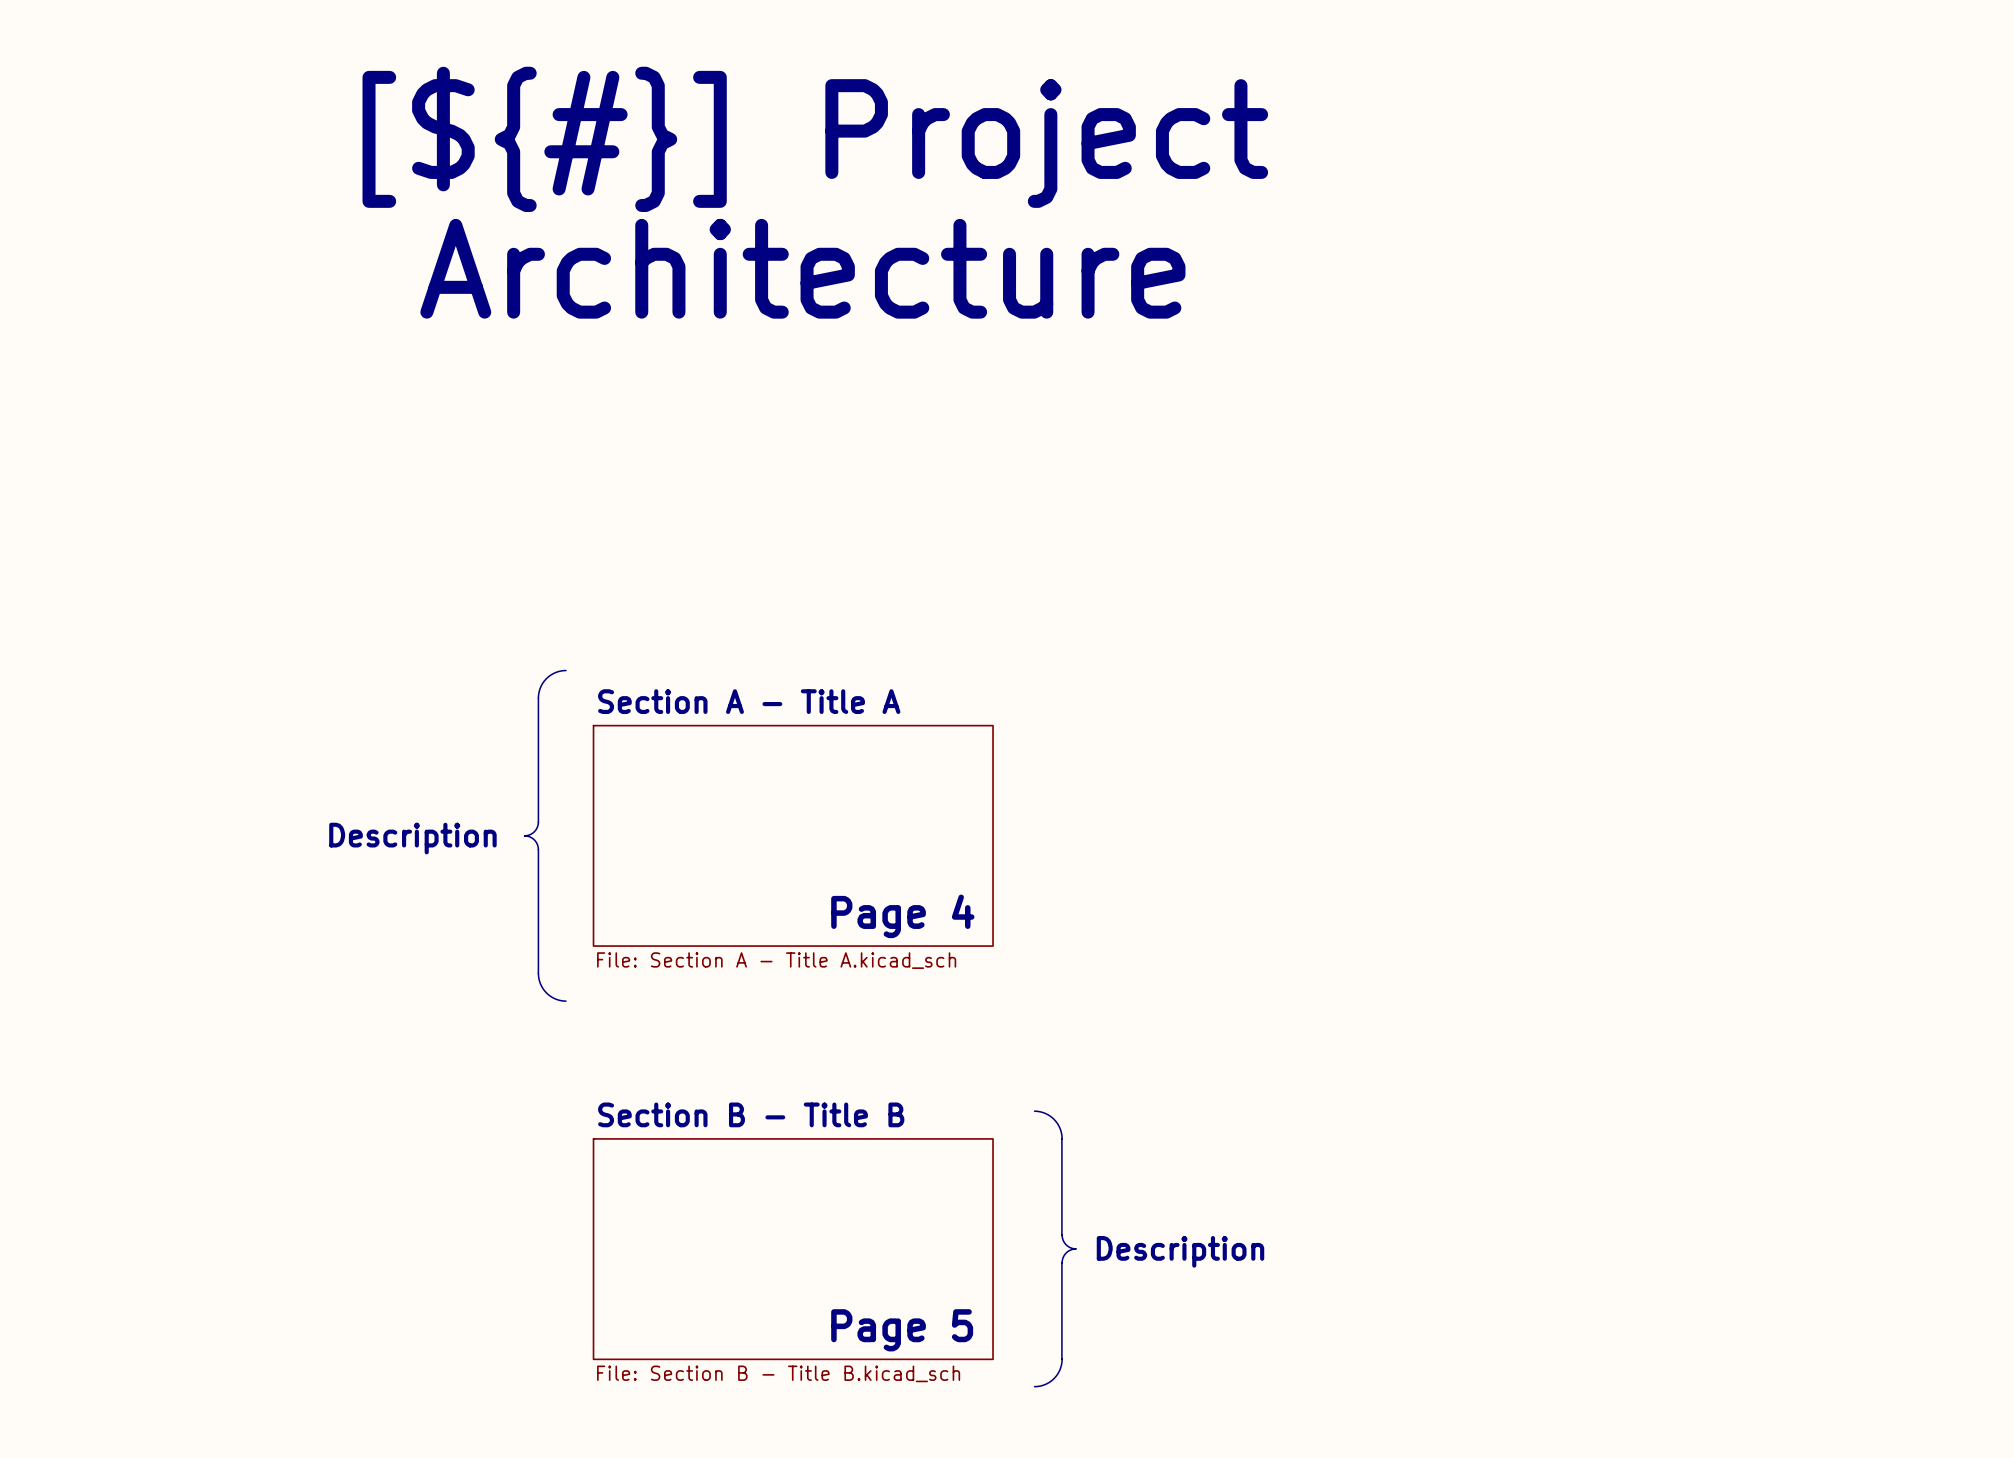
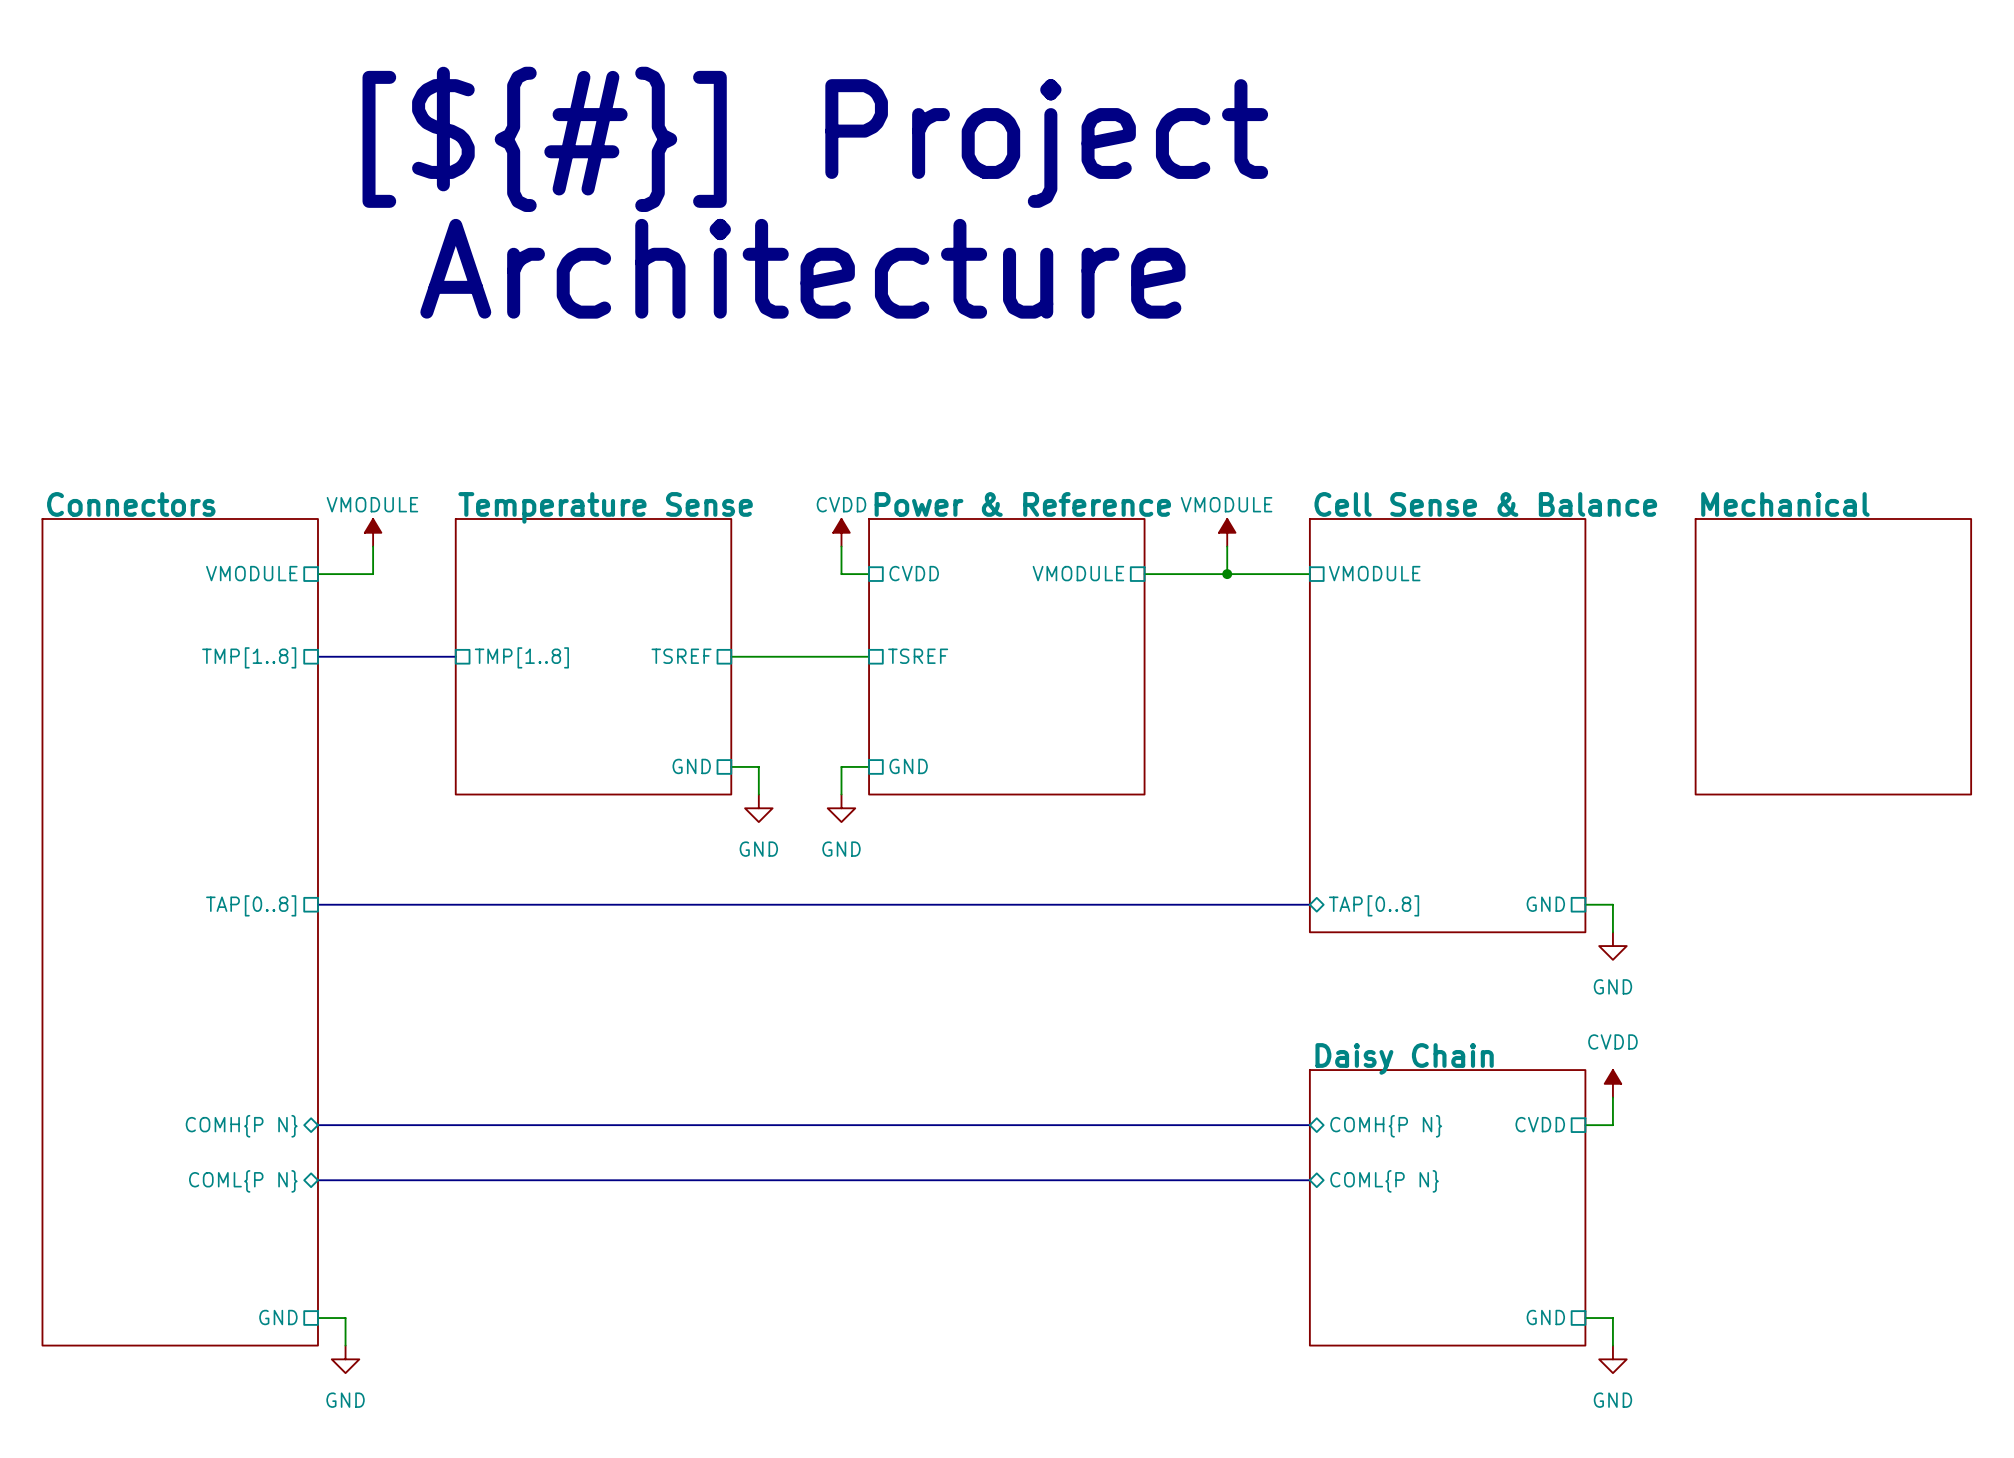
power symbol: none -> VMODULE (373, 532)
power symbol: none -> CVDD (841, 532)
power symbol: none -> VMODULE (1227, 532)
wire: none -> (373, 546) (373, 574) (317, 574)
wire: none -> (841, 546) (841, 574) (869, 574)
wire: none -> (1227, 546) (1227, 574)
sheet pin: none -> VMODULE (251, 573)
sheet pin: none -> CVDD (914, 573)
sheet pin: none -> VMODULE (1078, 573)
sheet pin: none -> VMODULE (1374, 573)
wire: none -> (1144, 574) (1309, 574)
junction: none -> (1227, 574)
bus: none -> (317, 656) (455, 656)
sheet Temperature Sense: none -> (593, 656)
sheet pin: none -> TSREF (681, 656)
wire: none -> (731, 656) (869, 656)
sheet pin: none -> TSREF (918, 656)
sheet Power & Reference: none -> (1006, 656)
sheet Mechanical: none -> (1833, 656)
sheet pin: none -> TMP[1..8] (249, 657)
sheet pin: none -> TMP[1..8] (521, 657)
line: (565, 670) (556, 672) (548, 676) (542, 683) (539, 691) (538, 823) (532, 832) (524, 835) (532, 838) (538, 847) (539, 980) (549, 995) (565, 1001) -> none
sheet Cell Sense & Balance: none -> (1447, 725)
sheet pin: none -> GND (691, 766)
wire: none -> (731, 766) (758, 766) (758, 794)
wire: none -> (869, 766) (841, 766) (841, 794)
sheet pin: none -> GND (908, 766)
power symbol: none -> GND (758, 808)
power symbol: none -> GND (841, 808)
sheet Section A - Title A: File: Section A - Title A.kicad_sch (793, 835) -> none
text: Description (412, 838) -> none
bus: none -> (317, 904) (1309, 904)
sheet pin: none -> GND (1545, 904)
wire: none -> (1585, 904) (1612, 904) (1612, 932)
sheet pin: none -> TAP[0..8] (251, 905)
sheet pin: none -> TAP[0..8] (1374, 905)
text: Page 4 (902, 916) -> none
sheet Connectors: none -> (180, 932)
power symbol: none -> GND (1612, 946)
power symbol: none -> CVDD (1612, 1083)
wire: none -> (1612, 1097) (1612, 1125) (1585, 1125)
line: (1034, 1111) (1045, 1113) (1053, 1119) (1059, 1128) (1062, 1138) -> none
sheet pin: none -> CVDD (1540, 1124)
bus: none -> (317, 1125) (1309, 1125)
sheet pin: none -> COMH{P N} (241, 1126)
sheet pin: none -> COMH{P N} (1386, 1126)
line: (1061, 1138) (1061, 1235) -> none
bus: none -> (317, 1180) (1309, 1180)
sheet pin: none -> COML{P N} (243, 1181)
sheet pin: none -> COML{P N} (1384, 1181)
sheet Daisy Chain: none -> (1447, 1207)
line: (1062, 1235) (1066, 1244) (1075, 1248) (1066, 1252) (1062, 1262) -> none
sheet Section B - Title B: File: Section B - Title B.kicad_sch (793, 1249) -> none
text: Description (1180, 1251) -> none
line: (1061, 1262) (1061, 1359) -> none
sheet pin: none -> GND (278, 1317)
sheet pin: none -> GND (1545, 1317)
wire: none -> (317, 1318) (345, 1318) (345, 1345)
wire: none -> (1585, 1318) (1612, 1318) (1612, 1345)
text: Page 5 (902, 1330) -> none
power symbol: none -> GND (345, 1359)
line: (1062, 1359) (1060, 1368) (1054, 1378) (1043, 1385) (1034, 1386) -> none
power symbol: none -> GND (1612, 1359)

